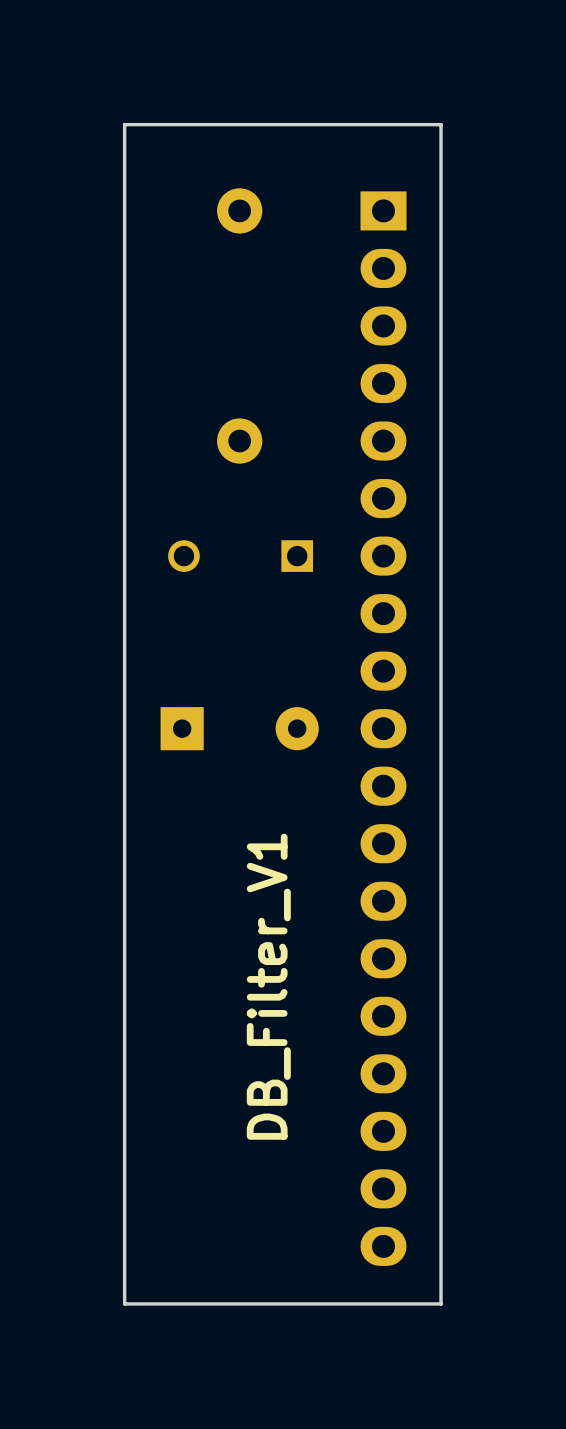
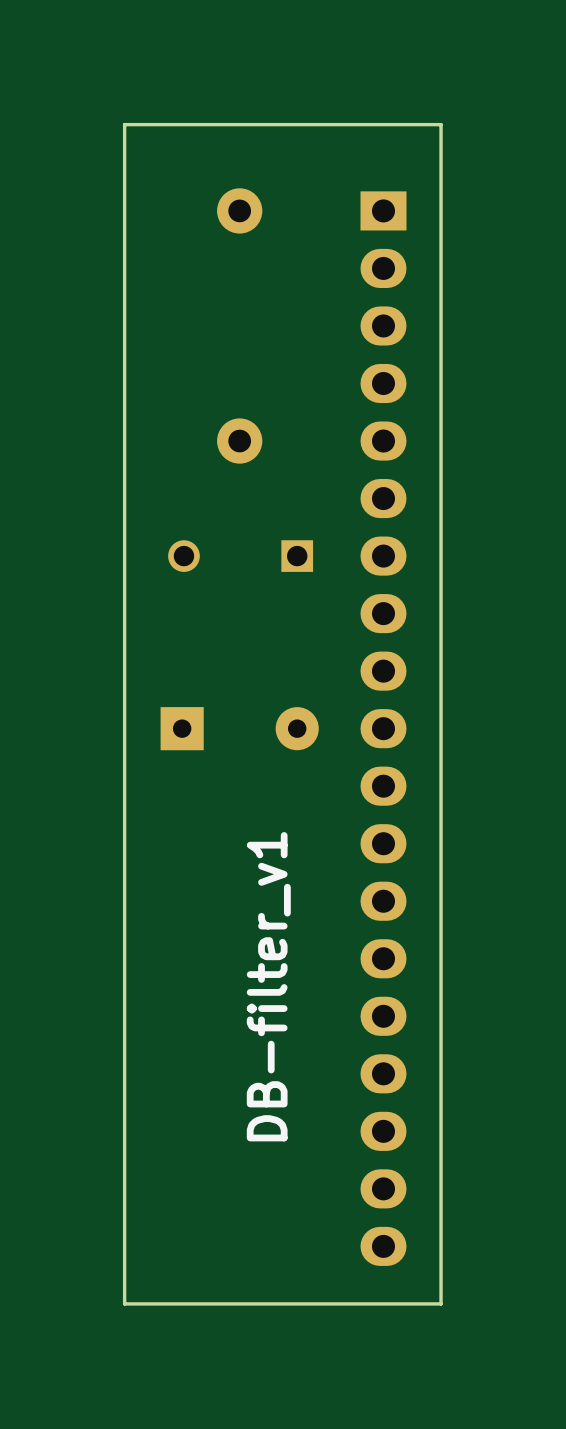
text: DB_Filter_V1 (268, 986) -> DB-filter_v1 (268, 986)

